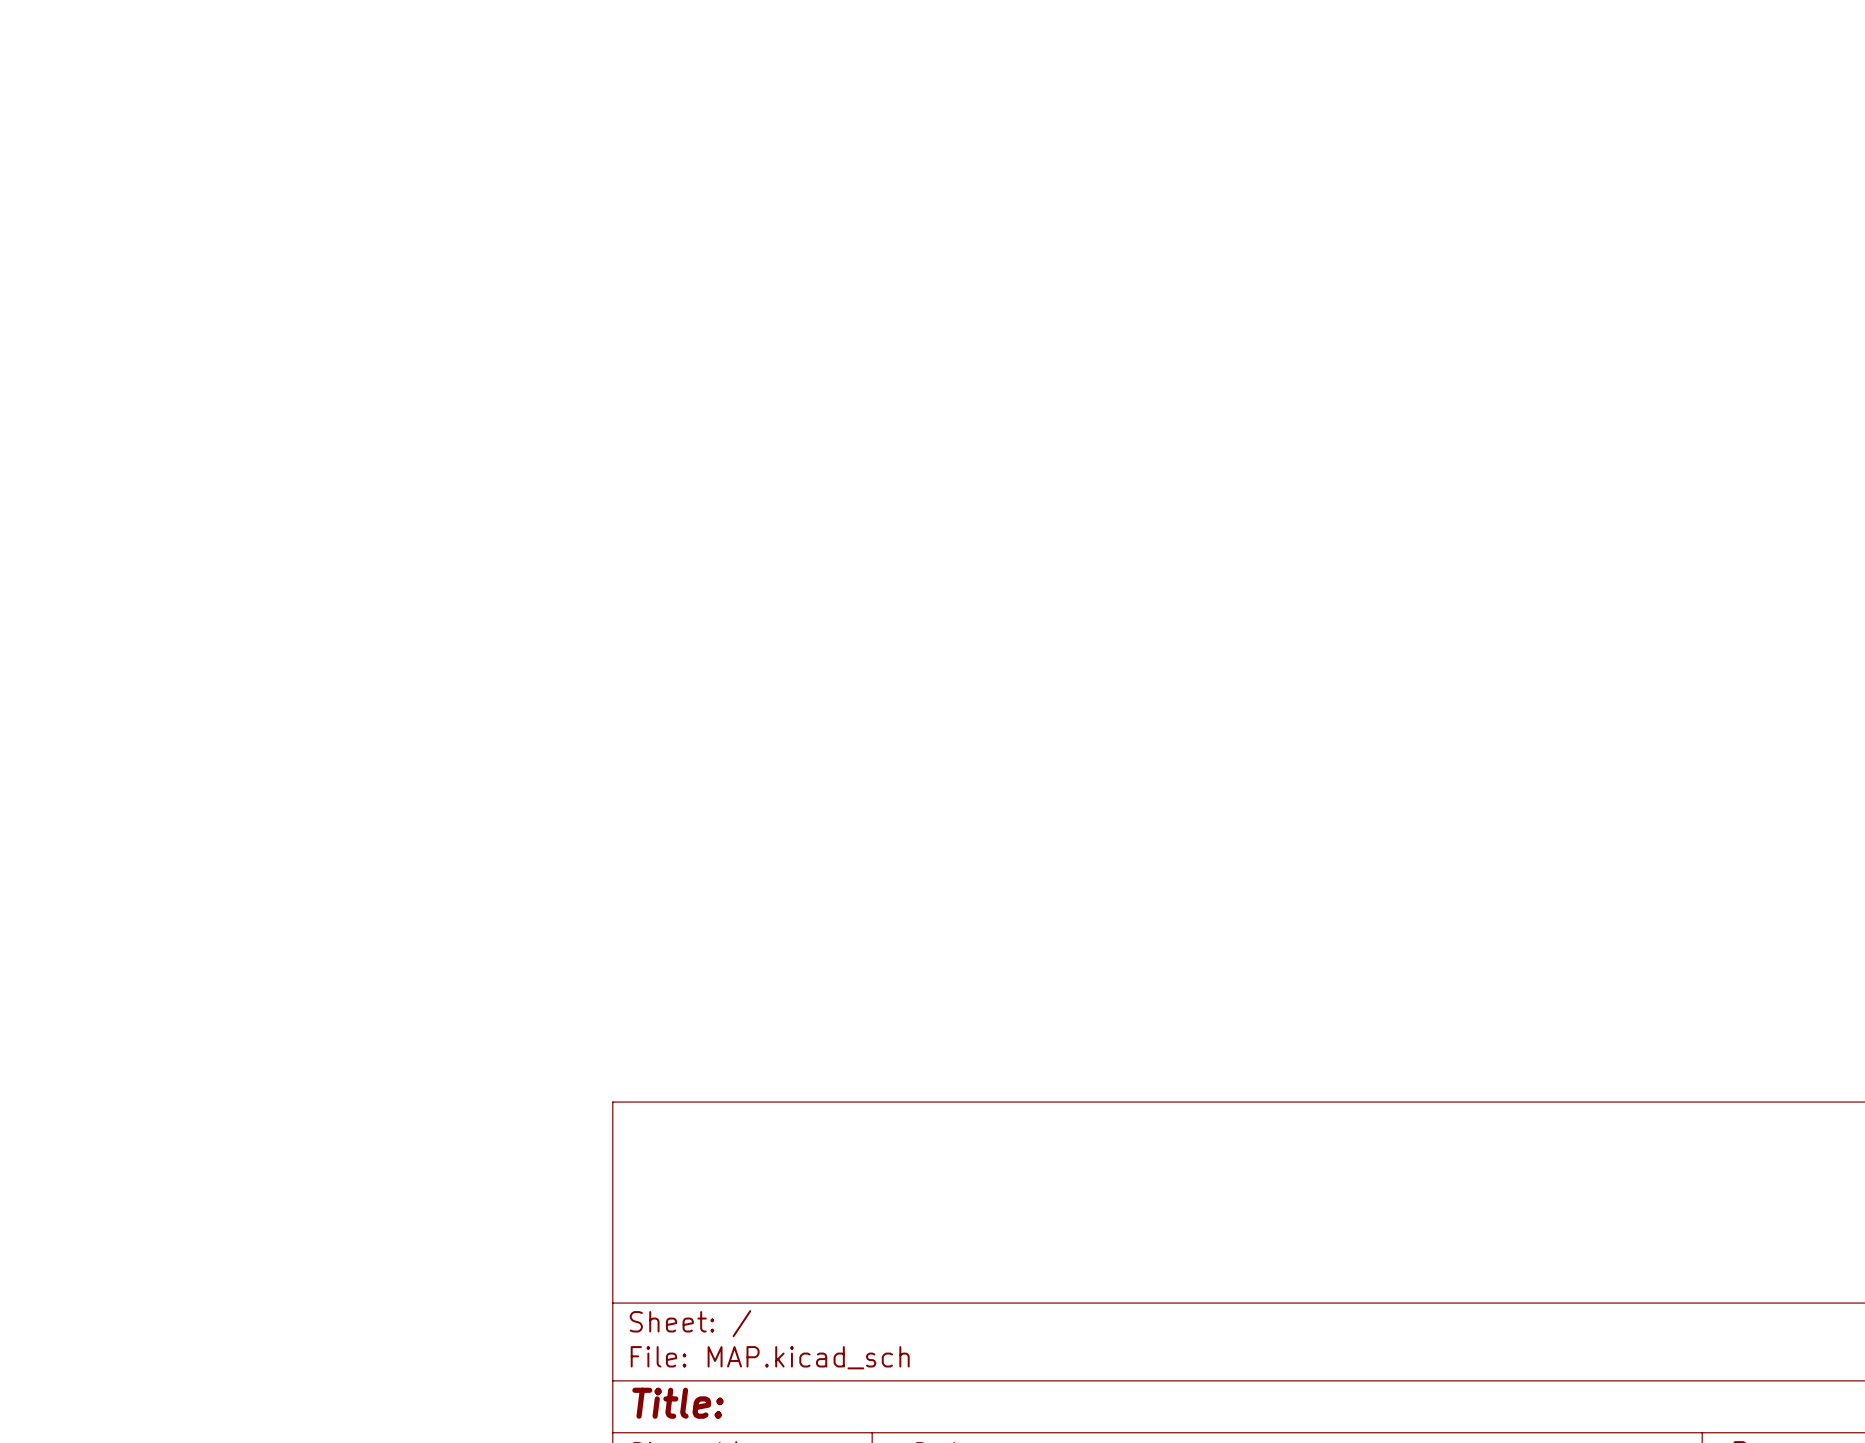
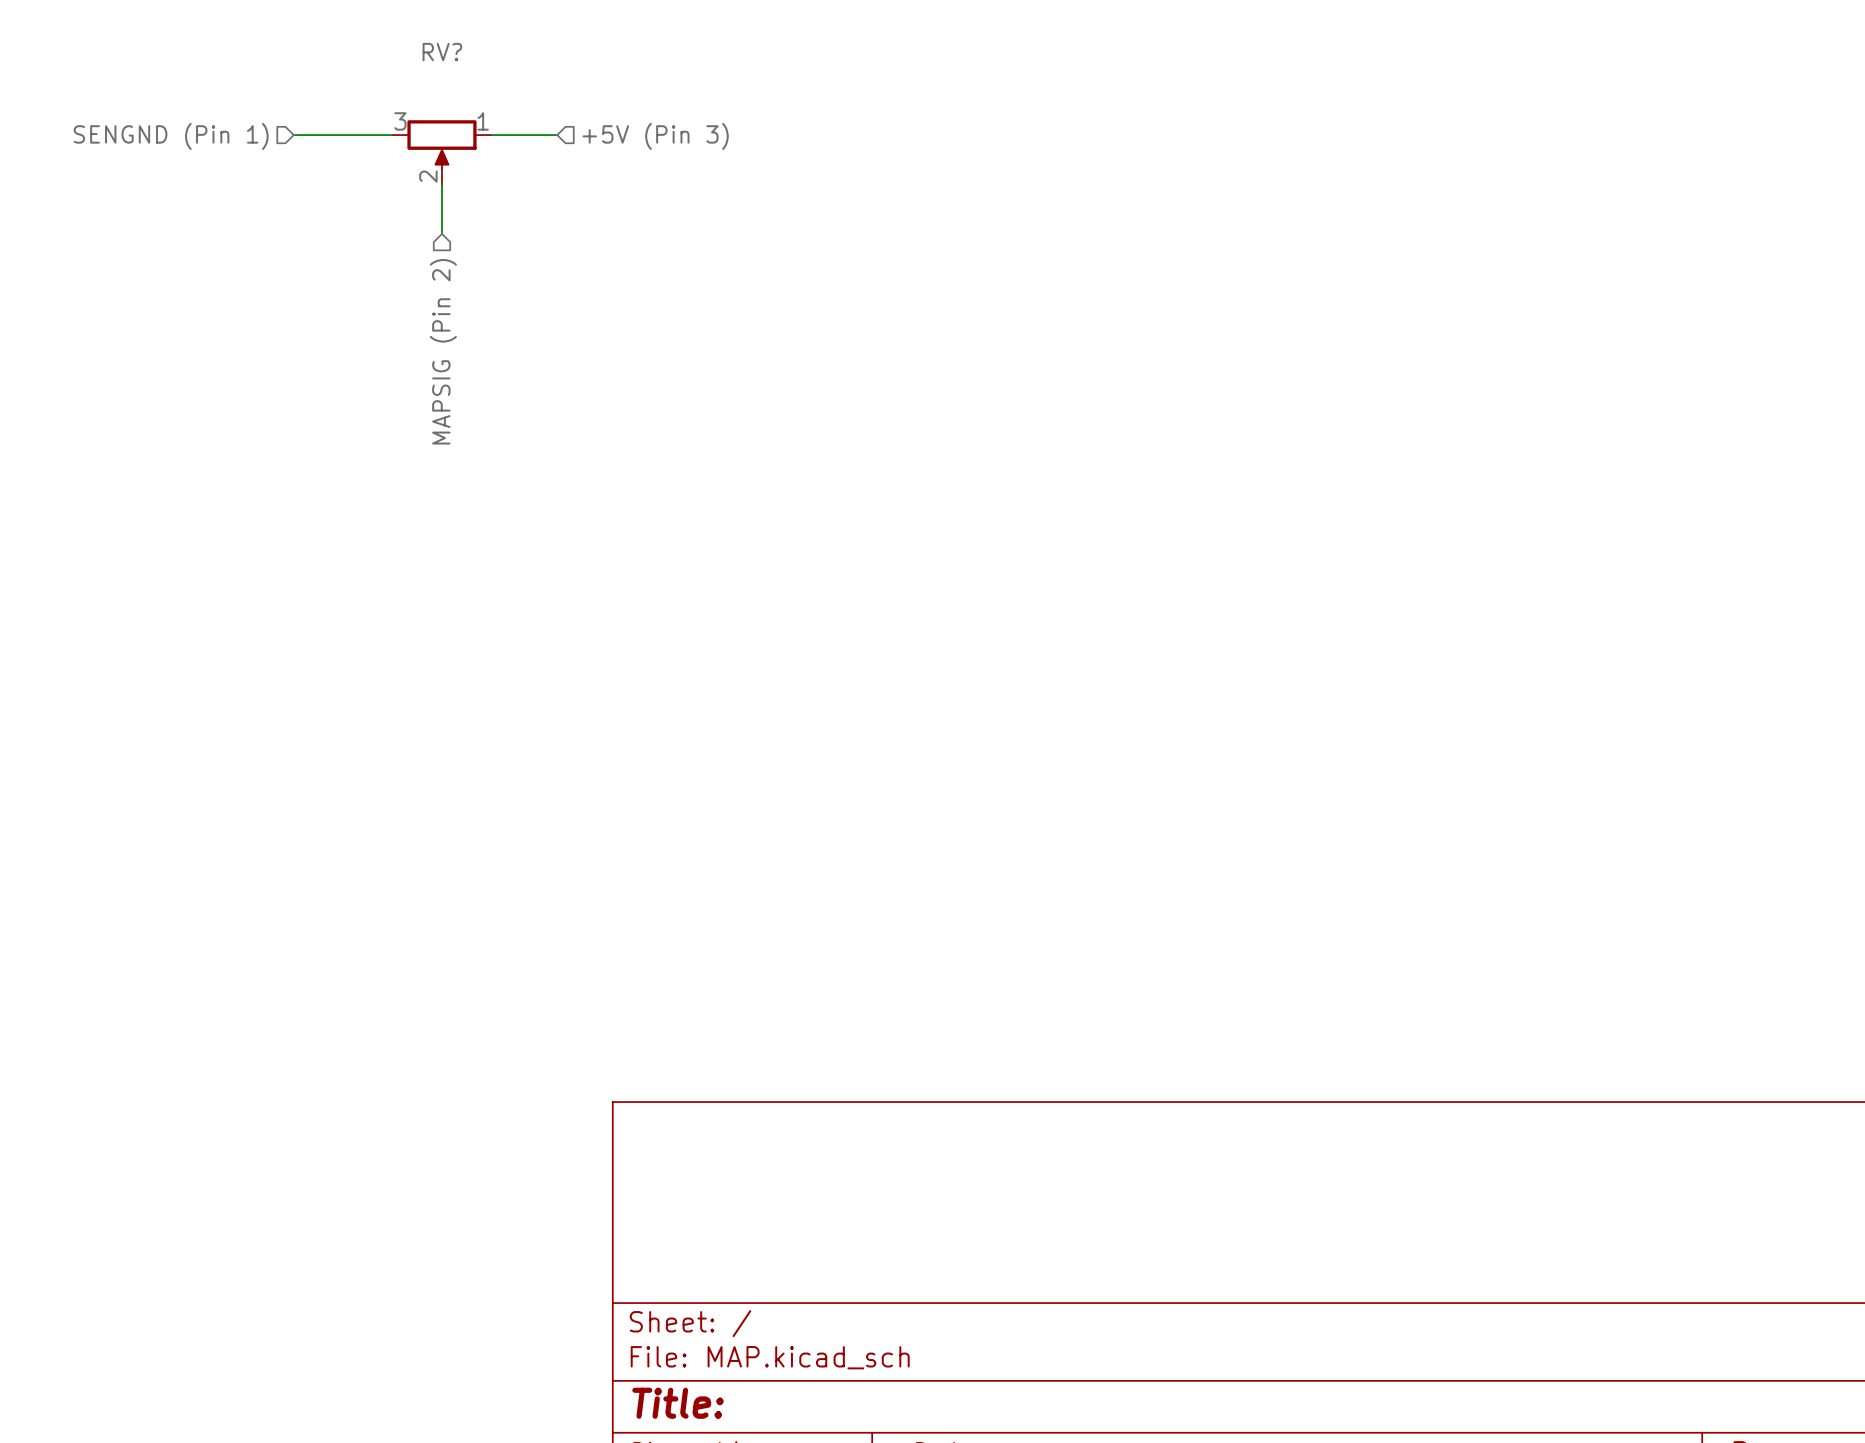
wire: none -> (293, 135) (392, 135)
wire: none -> (491, 135) (557, 135)
hierarchical label: none -> SENGND (Pin 1) (171, 136)
hierarchical label: none -> +5V (Pin 3) (655, 136)
RV?: none -> (441, 152)
wire: none -> (441, 184) (441, 233)
hierarchical label: none -> MAPSIG (Pin 2) (443, 351)

